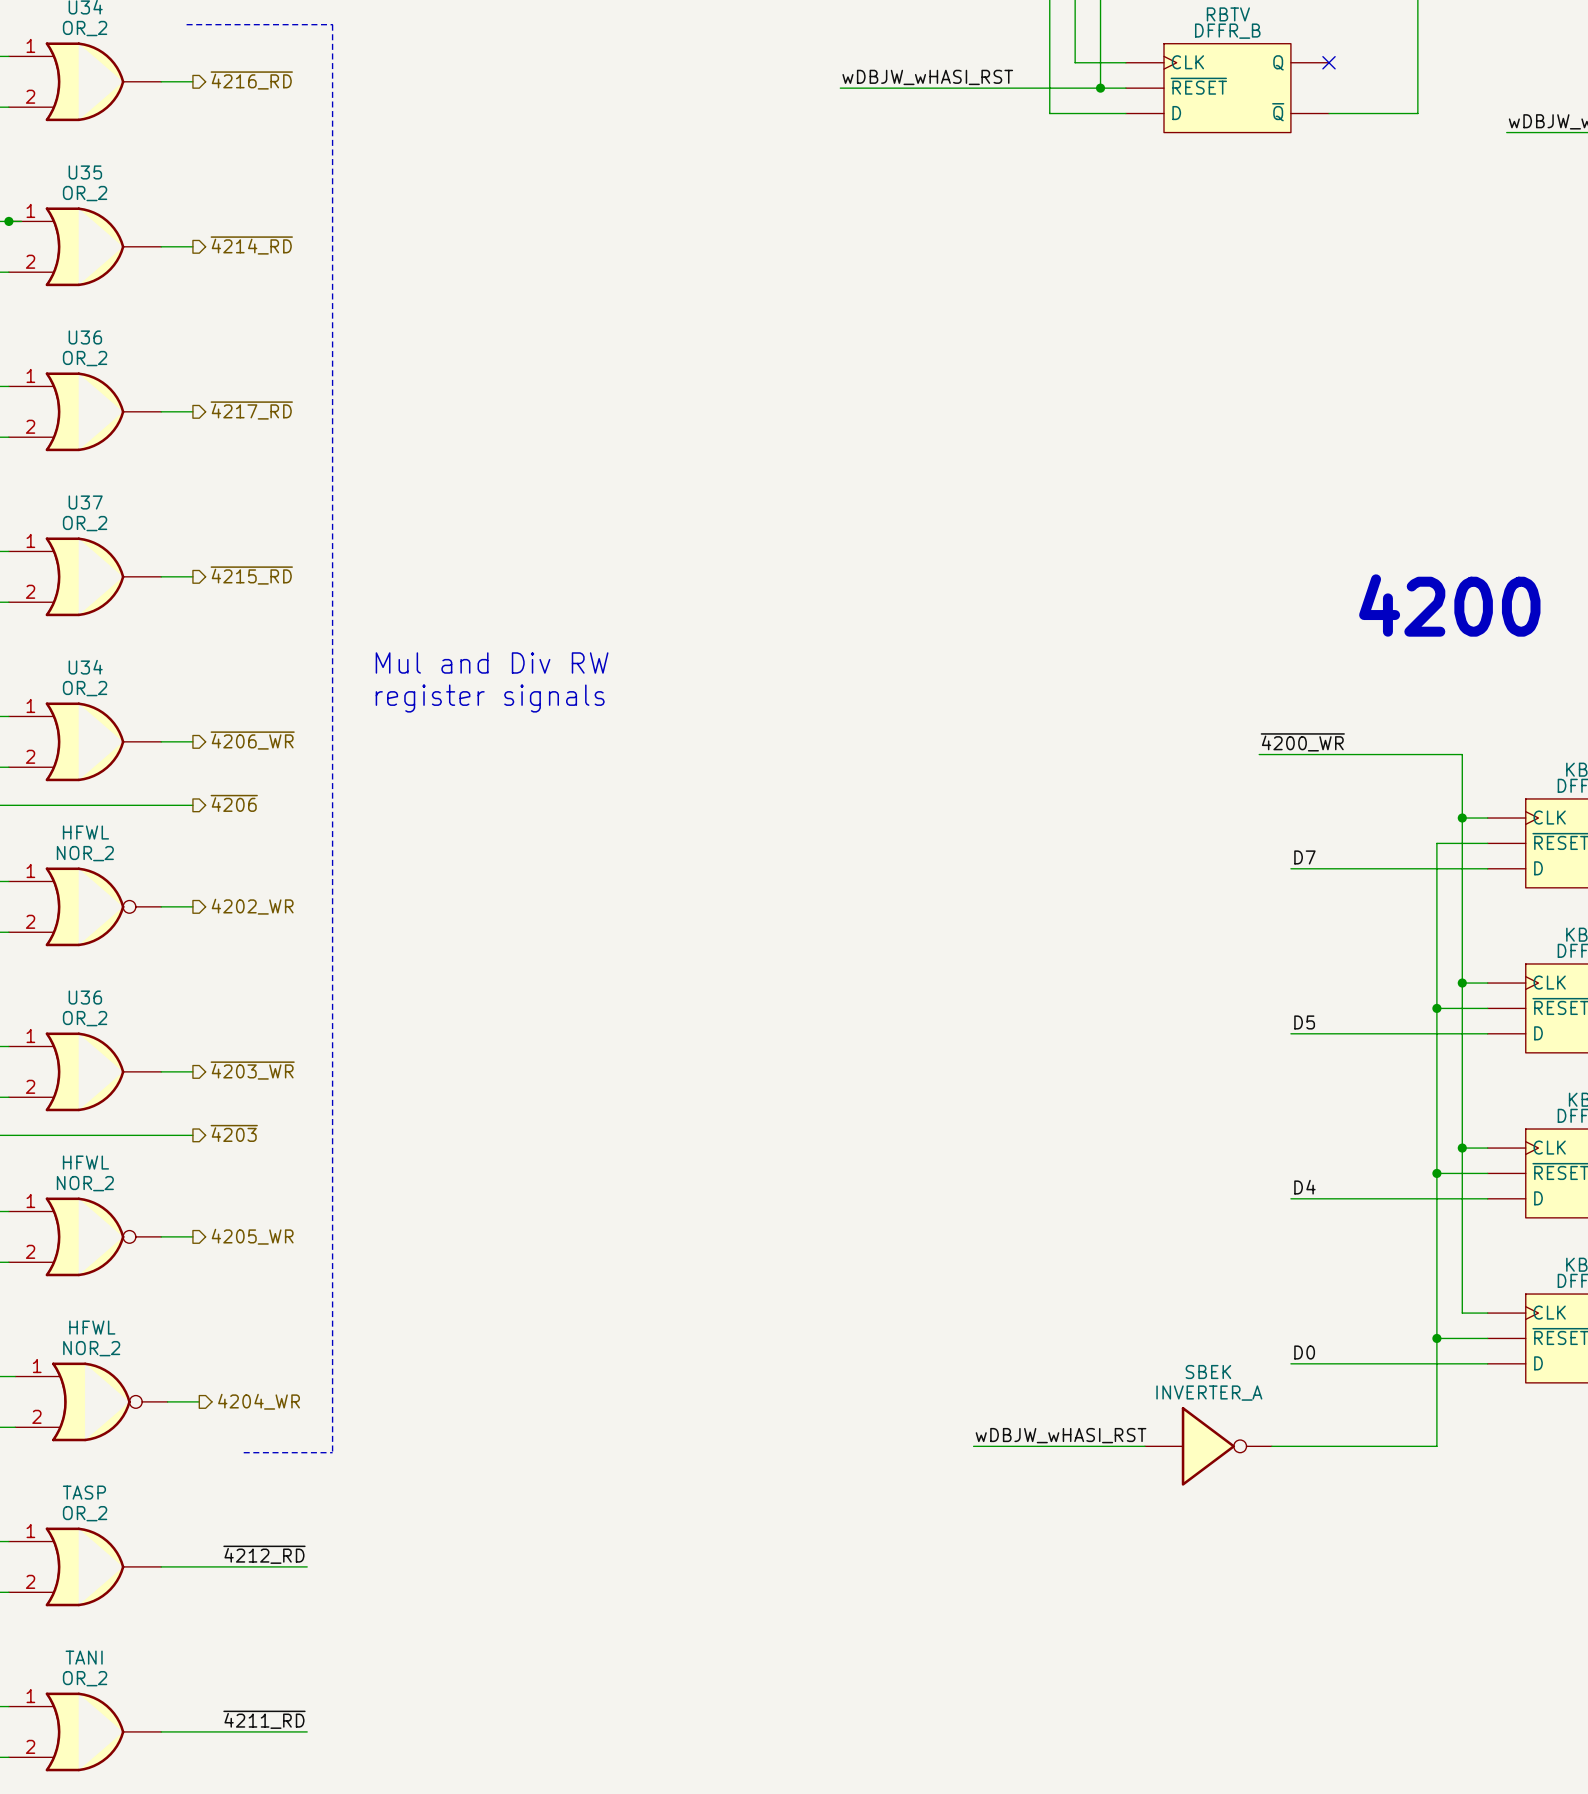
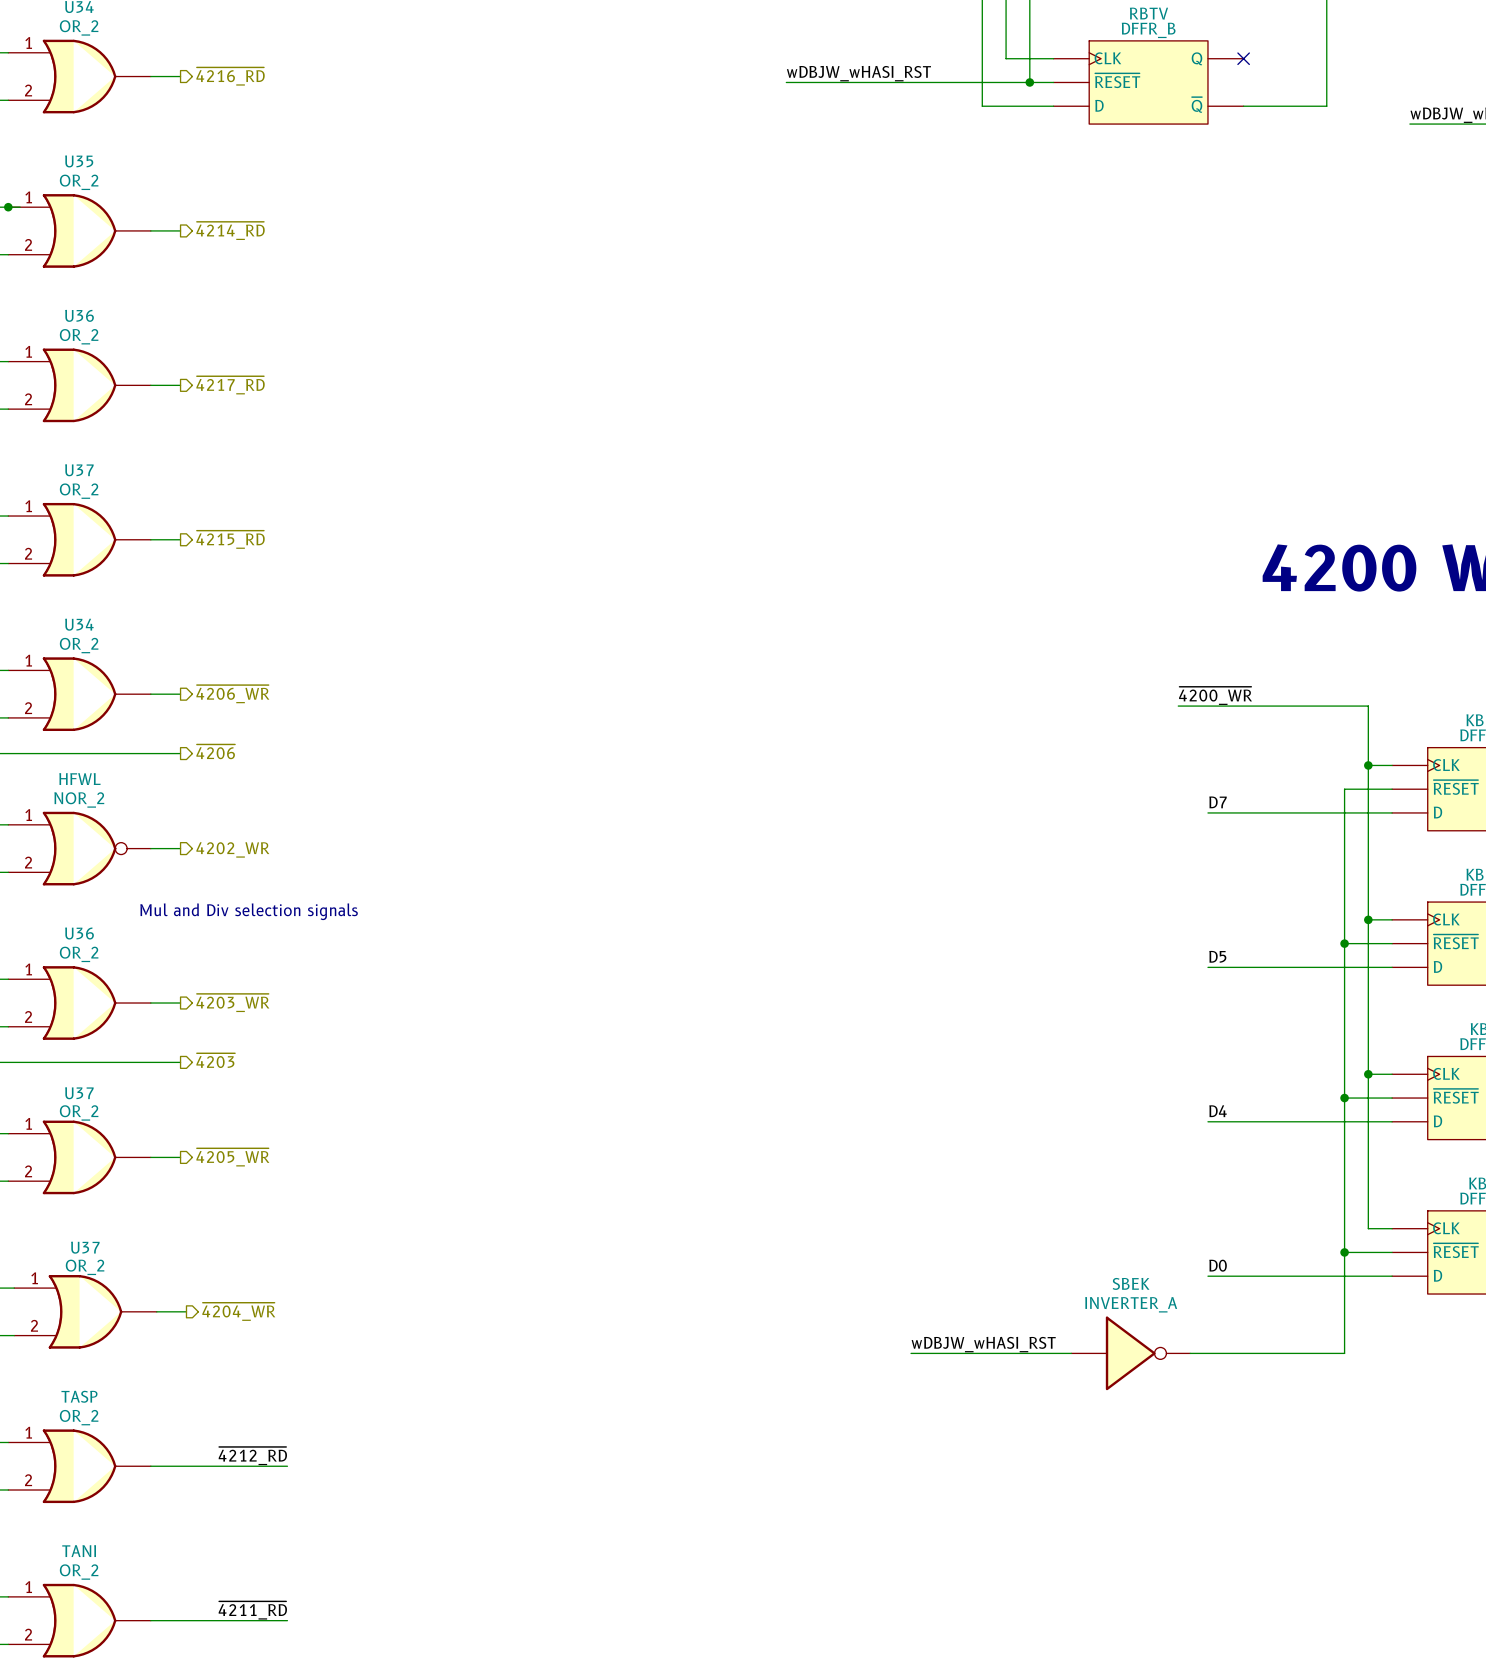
line: (186, 24) (332, 24) (332, 1452) (243, 1452) -> none
text: Mul and Div RW (492, 662) -> none
text: register signals (490, 698) -> none
text: none -> Mul and Div selection signals (249, 911)
HFWL: NOR_2 (85, 1236) -> none
U37: none -> OR_2 (79, 1157)
hierarchical label: 4205_WR (252, 1236) -> ~{4205_WR} (232, 1157)
HFWL: NOR_2 (91, 1401) -> none
U37: none -> OR_2 (85, 1311)
hierarchical label: 4204_WR (259, 1401) -> ~{4204_WR} (238, 1311)

